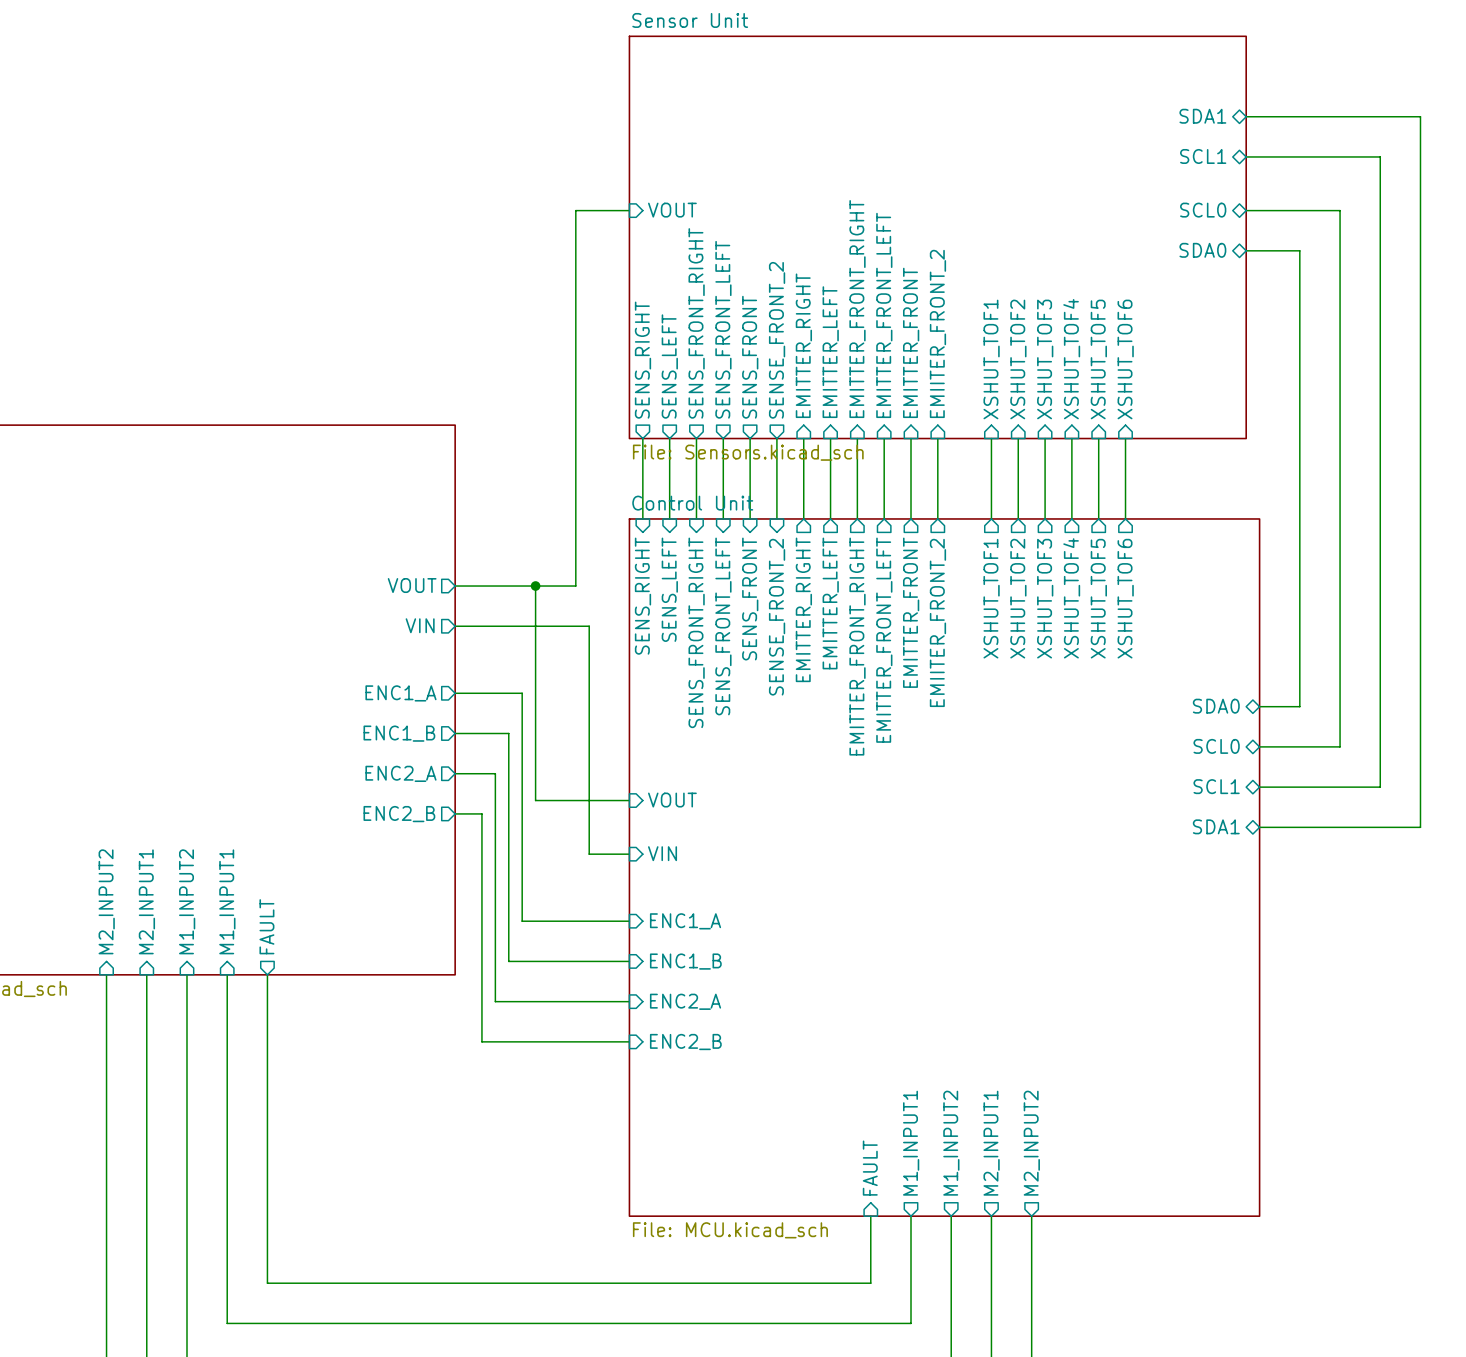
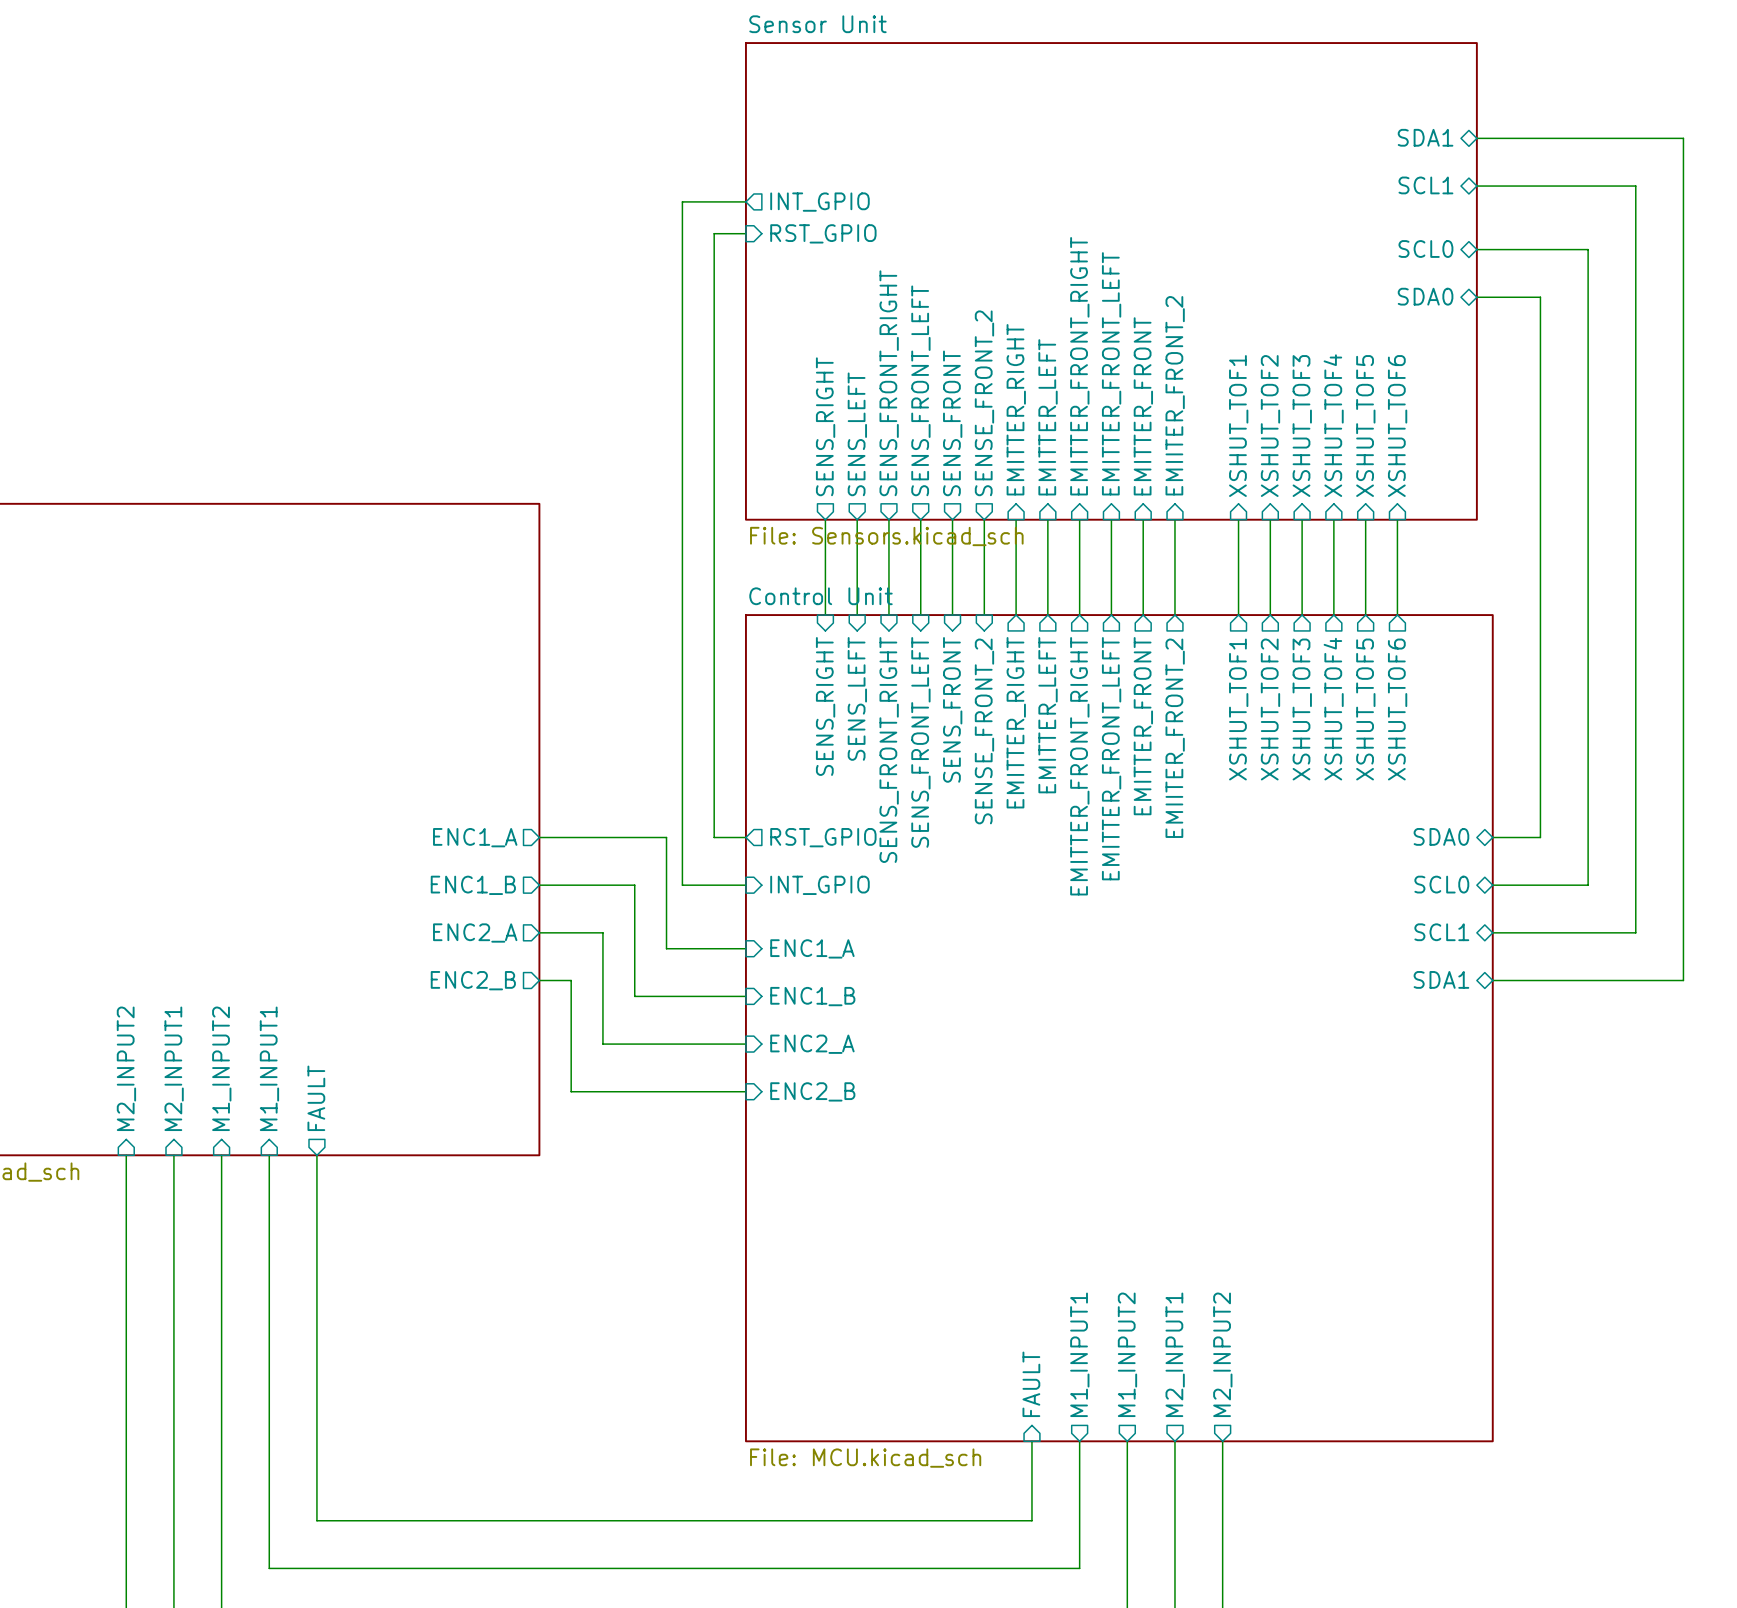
sheet pin: none -> INT_GPIO (819, 202)
wire: none -> (745, 233) (714, 233) (714, 837) (745, 837)
sheet pin: none -> RST_GPIO (823, 233)
wire: (575, 210) (629, 210) -> (682, 249) (682, 201) (745, 201)
sheet pin: VOUT (672, 210) -> none
sheet pin: EMITTER_FRONT_RIGHT (857, 309) -> EMITTER_RIGHT (1016, 409)
sheet pin: EMITTER_FRONT_LEFT (884, 315) -> EMITTER_LEFT (1048, 417)
sheet pin: SENS_FRONT_RIGHT (696, 323) -> SENS_RIGHT (825, 426)
sheet pin: SENS_FRONT_LEFT (723, 329) -> SENS_LEFT (857, 434)
sheet pin: EMIITER_FRONT_2 (937, 333) -> EMITTER_FRONT_LEFT (1111, 373)
sheet pin: SENSE_FRONT_2 (777, 340) -> SENS_FRONT_LEFT (920, 390)
sheet pin: EMITTER_FRONT (911, 342) -> EMITTER_FRONT_RIGHT (1079, 366)
sheet pin: none -> EMITTER_FRONT (1143, 406)
sheet pin shape: input (803, 345) -> output (952, 423)
sheet pin: EMITTER_RIGHT (803, 345) -> SENS_FRONT (952, 423)
sheet pin shape: input (830, 352) -> output (984, 403)
sheet pin: EMITTER_LEFT (830, 352) -> SENSE_FRONT_2 (984, 403)
sheet pin: SENS_FRONT (750, 357) -> SENS_FRONT_RIGHT (889, 383)
sheet pin: XSHUT_TOF1 (991, 359) -> EMIITER_FRONT_2 (1175, 395)
sheet pin: XSHUT_TOF2 (1018, 359) -> none
sheet pin: XSHUT_TOF3 (1045, 359) -> XSHUT_TOF1 (1238, 426)
sheet pin: XSHUT_TOF4 (1071, 359) -> XSHUT_TOF2 (1270, 426)
sheet pin: XSHUT_TOF5 (1098, 359) -> XSHUT_TOF3 (1302, 426)
sheet pin: XSHUT_TOF6 (1125, 359) -> XSHUT_TOF4 (1333, 425)
sheet pin: none -> XSHUT_TOF5 (1365, 426)
sheet pin: none -> XSHUT_TOF6 (1397, 426)
sheet pin: SENS_RIGHT (642, 360) -> none
sheet pin: SENS_LEFT (669, 366) -> none
wire: (642, 438) (642, 518) -> none
wire: (669, 438) (669, 518) -> none
wire: (1018, 438) (1018, 518) -> (1143, 519) (1143, 615)
wire: none -> (1365, 519) (1365, 615)
wire: none -> (1397, 519) (1397, 615)
sheet pin: VOUT (412, 585) -> none
wire: (455, 586) (575, 586) -> (745, 885) (682, 885) (682, 694)
wire: (535, 586) (535, 746) -> (539, 885) (634, 885)
junction: (535, 586) -> none
sheet pin: SENS_LEFT (669, 589) -> none
sheet pin: SENS_RIGHT (642, 596) -> none
sheet pin: SENS_FRONT (750, 598) -> SENS_FRONT_RIGHT (889, 749)
sheet pin: XSHUT_TOF1 (991, 598) -> EMIITER_FRONT_2 (1175, 738)
sheet pin: XSHUT_TOF2 (1018, 598) -> none
sheet pin: XSHUT_TOF3 (1045, 598) -> XSHUT_TOF1 (1238, 709)
sheet pin: XSHUT_TOF4 (1071, 598) -> XSHUT_TOF2 (1270, 709)
sheet pin: XSHUT_TOF5 (1098, 598) -> XSHUT_TOF3 (1302, 709)
sheet pin: XSHUT_TOF6 (1125, 598) -> XSHUT_TOF4 (1333, 709)
sheet pin: none -> XSHUT_TOF5 (1365, 709)
sheet pin: none -> XSHUT_TOF6 (1397, 709)
sheet pin shape: output (830, 603) -> input (984, 731)
sheet pin: EMITTER_LEFT (830, 603) -> SENSE_FRONT_2 (984, 731)
sheet pin shape: output (803, 609) -> input (952, 709)
sheet pin: EMITTER_RIGHT (803, 609) -> SENS_FRONT (952, 709)
sheet pin: EMITTER_FRONT (911, 612) -> EMITTER_FRONT_RIGHT (1079, 766)
sheet pin: none -> EMITTER_FRONT (1143, 726)
sheet pin: SENSE_FRONT_2 (777, 617) -> SENS_FRONT_LEFT (920, 742)
sheet pin: EMIITER_FRONT_2 (937, 622) -> EMITTER_FRONT_LEFT (1111, 758)
sheet pin: VIN (420, 625) -> none
wire: (455, 626) (589, 626) (589, 854) (629, 854) -> none
sheet pin: SENS_FRONT_LEFT (723, 626) -> SENS_LEFT (857, 698)
sheet pin: SENS_FRONT_RIGHT (696, 632) -> SENS_RIGHT (825, 706)
sheet pin: EMITTER_FRONT_LEFT (884, 640) -> EMITTER_LEFT (1048, 715)
sheet pin: EMITTER_FRONT_RIGHT (857, 646) -> EMITTER_RIGHT (1016, 722)
sheet pin position: ENC1_A (400, 693) -> ENC1_A (475, 837)
wire: (455, 693) (522, 693) (522, 921) -> none
wire: none -> (539, 837) (666, 837) (666, 948)
sheet pin: none -> RST_GPIO (823, 837)
sheet pin position: ENC1_B (399, 733) -> ENC1_B (473, 885)
wire: (455, 733) (508, 733) (508, 787) -> (539, 932) (602, 932)
sheet pin: none -> INT_GPIO (819, 885)
sheet pin position: ENC2_A (400, 773) -> ENC2_A (475, 933)
wire: (455, 773) (495, 773) (495, 1001) (629, 1001) -> none
wire: (535, 800) (562, 800) -> (634, 948) (634, 996) (745, 996)
sheet pin: VOUT (672, 800) -> ENC1_A (812, 948)
wire: (455, 813) (481, 813) (481, 827) -> (539, 980) (571, 980)
sheet pin position: ENC2_B (399, 814) -> ENC2_B (473, 980)
sheet pin: none -> ENC1_B (812, 996)
sheet pin: VIN (662, 853) -> none
wire: (508, 880) (508, 961) (629, 961) -> (602, 1044) (745, 1044)
sheet pin: none -> ENC2_A (812, 1044)
wire: (481, 921) (481, 1041) (629, 1041) -> (571, 1091) (618, 1091)
sheet pin: ENC1_A (685, 921) -> ENC2_B (812, 1091)
sheet pin: ENC1_B (685, 961) -> none
sheet pin: ENC2_A (685, 1001) -> none
sheet pin: ENC2_B (685, 1042) -> none

